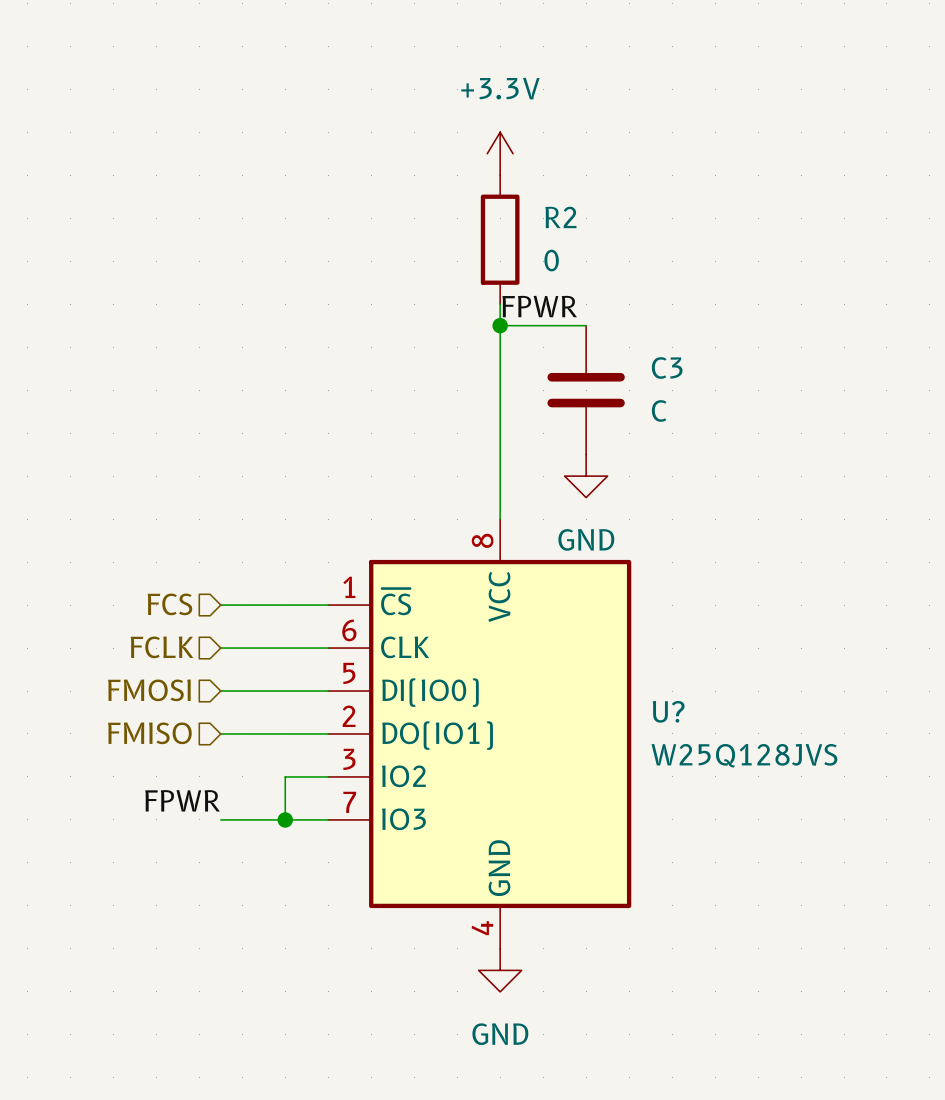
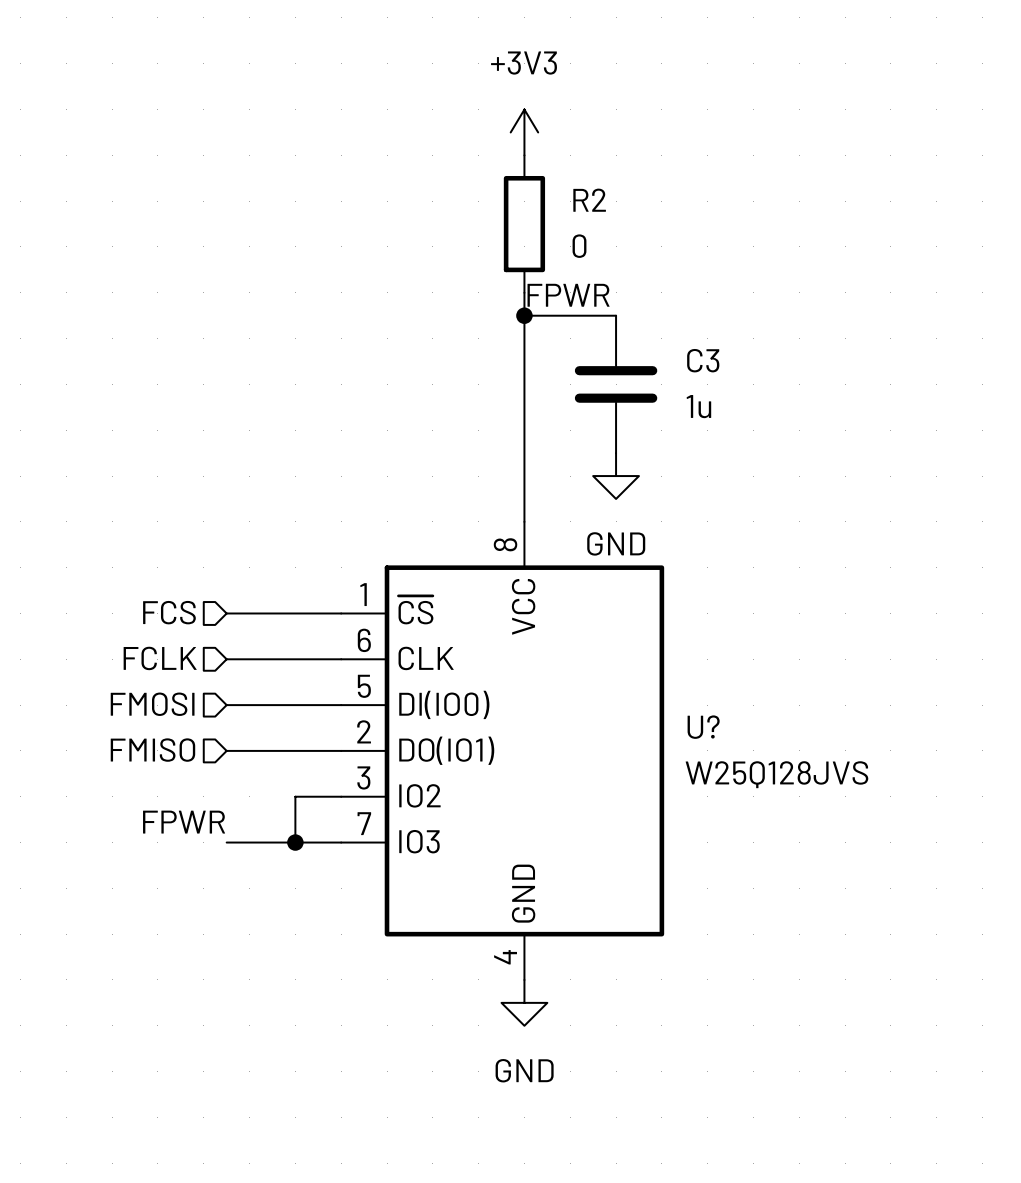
power symbol: +3.3V (500, 153) -> +3V3 (524, 132)
C3 value: C (659, 410) -> 1u (698, 406)

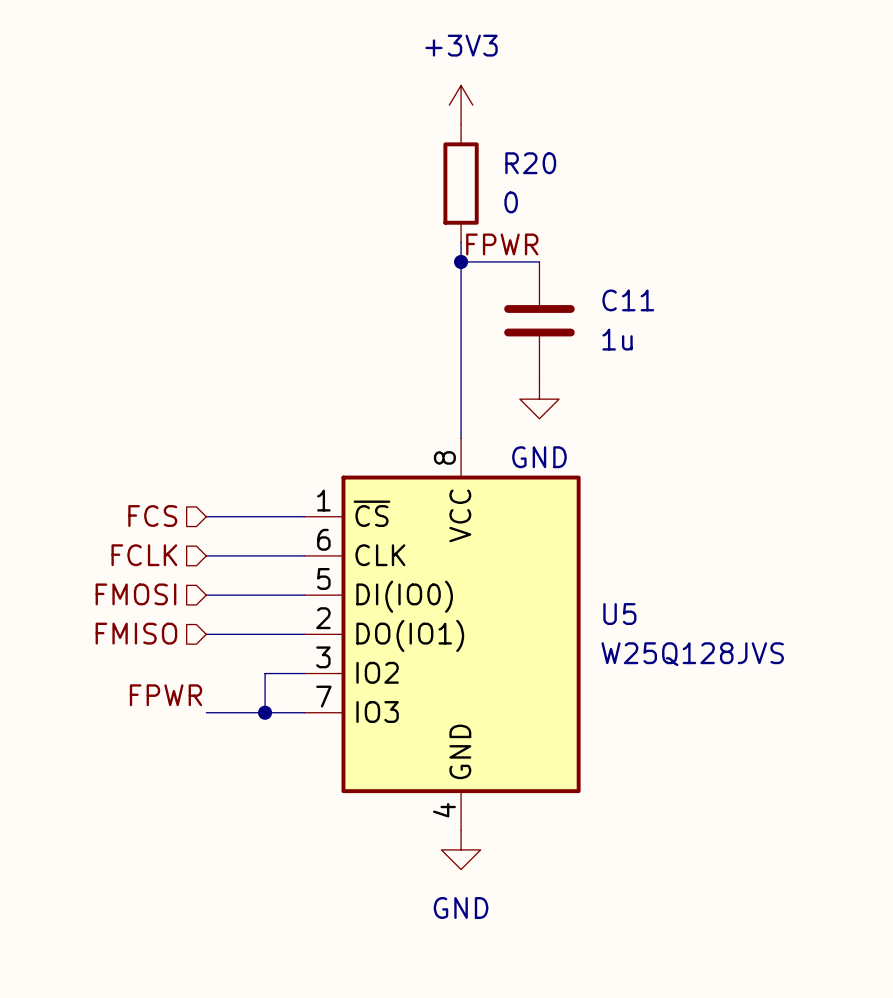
R2 name: R2 (589, 200) -> R20 (530, 163)
C3 name: C3 (703, 360) -> C11 (628, 300)
U? name: U? (703, 727) -> U5 (619, 614)

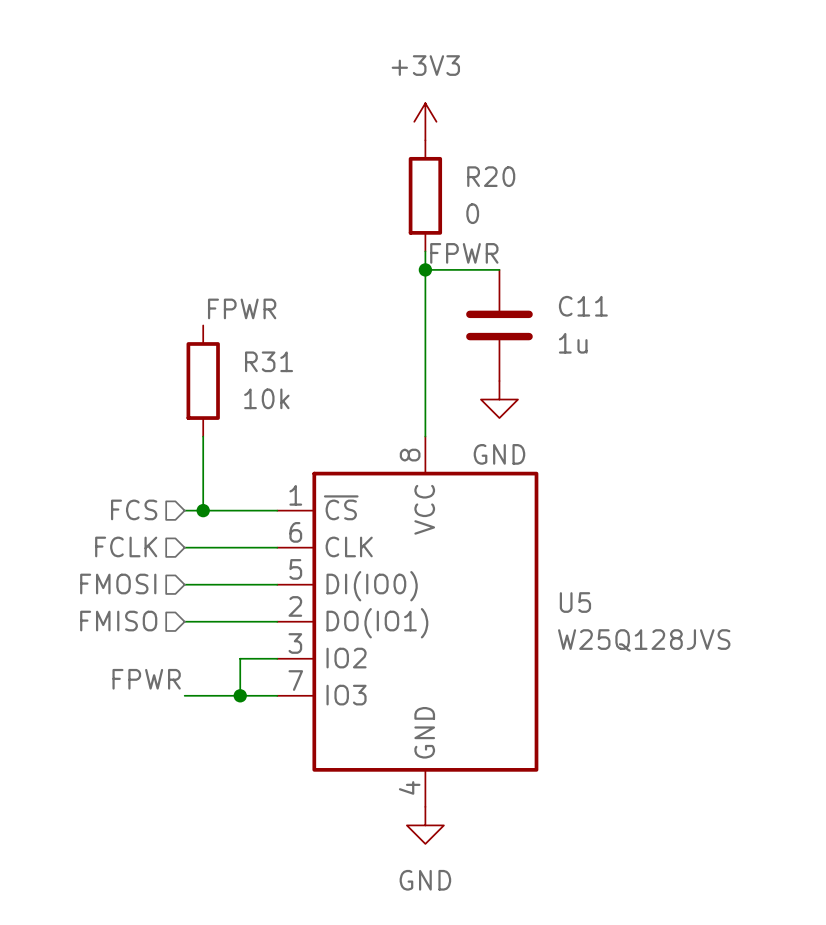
label: none -> FPWR (242, 308)
R31: none -> 10k (203, 381)
wire: none -> (203, 436) (203, 510)
junction: none -> (203, 510)

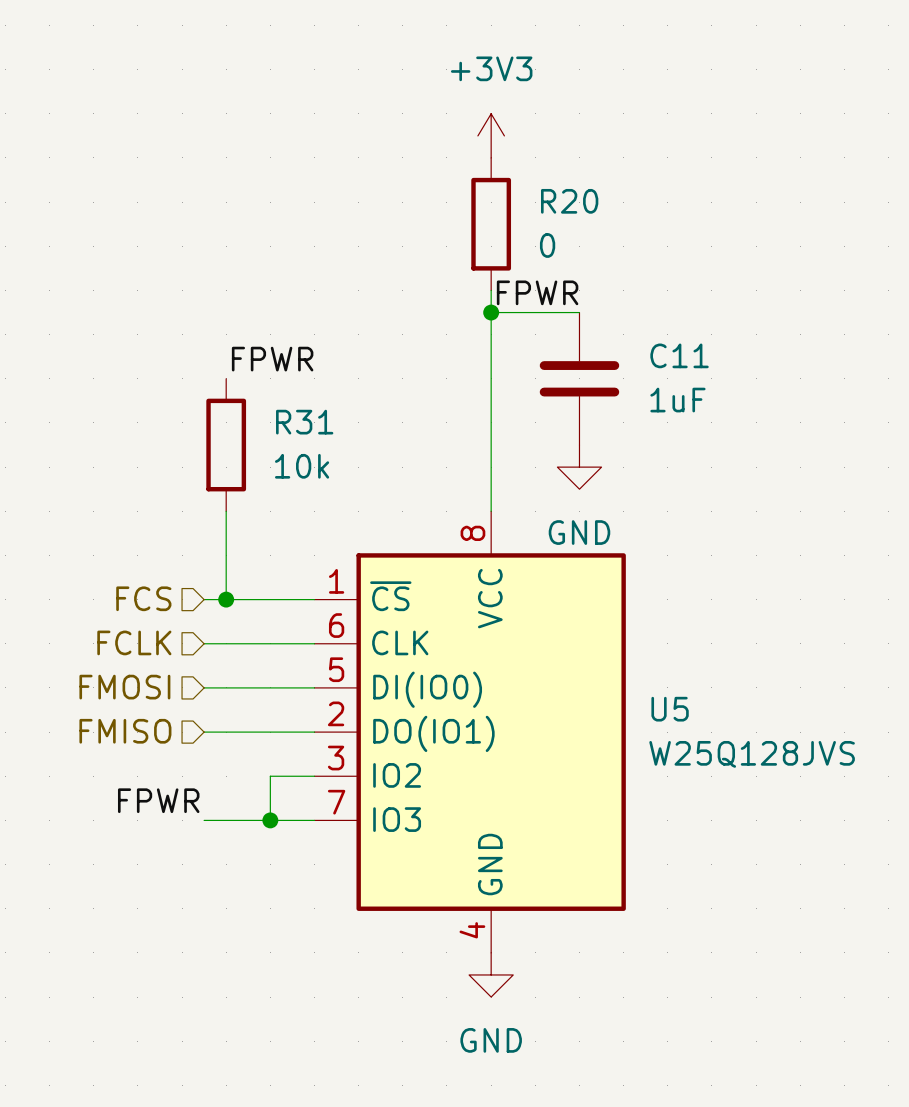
C11 value: 1u (573, 343) -> 1uF (677, 400)

